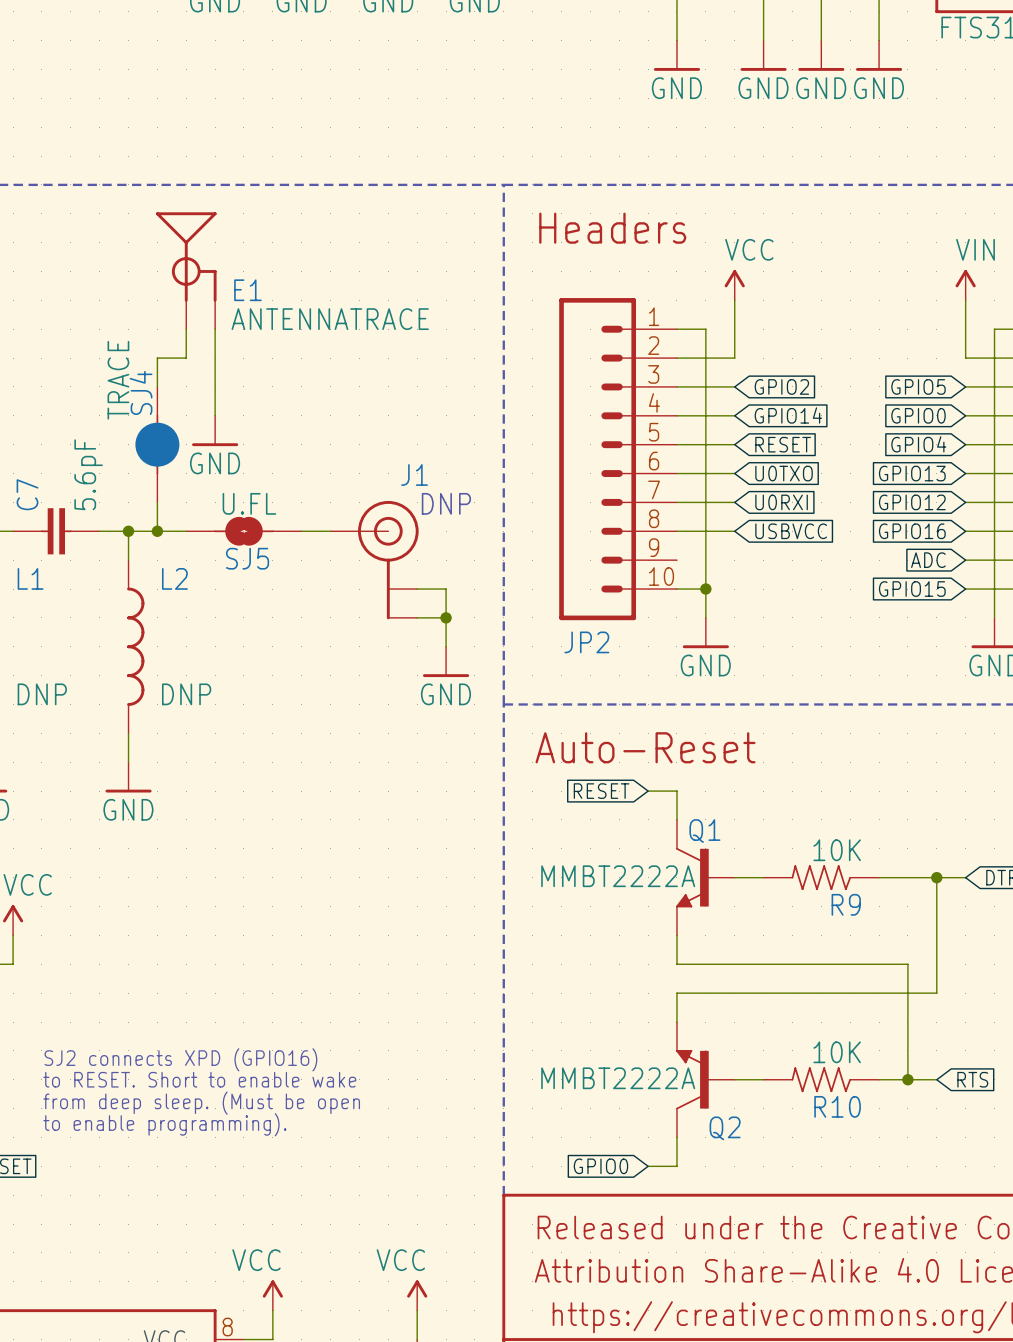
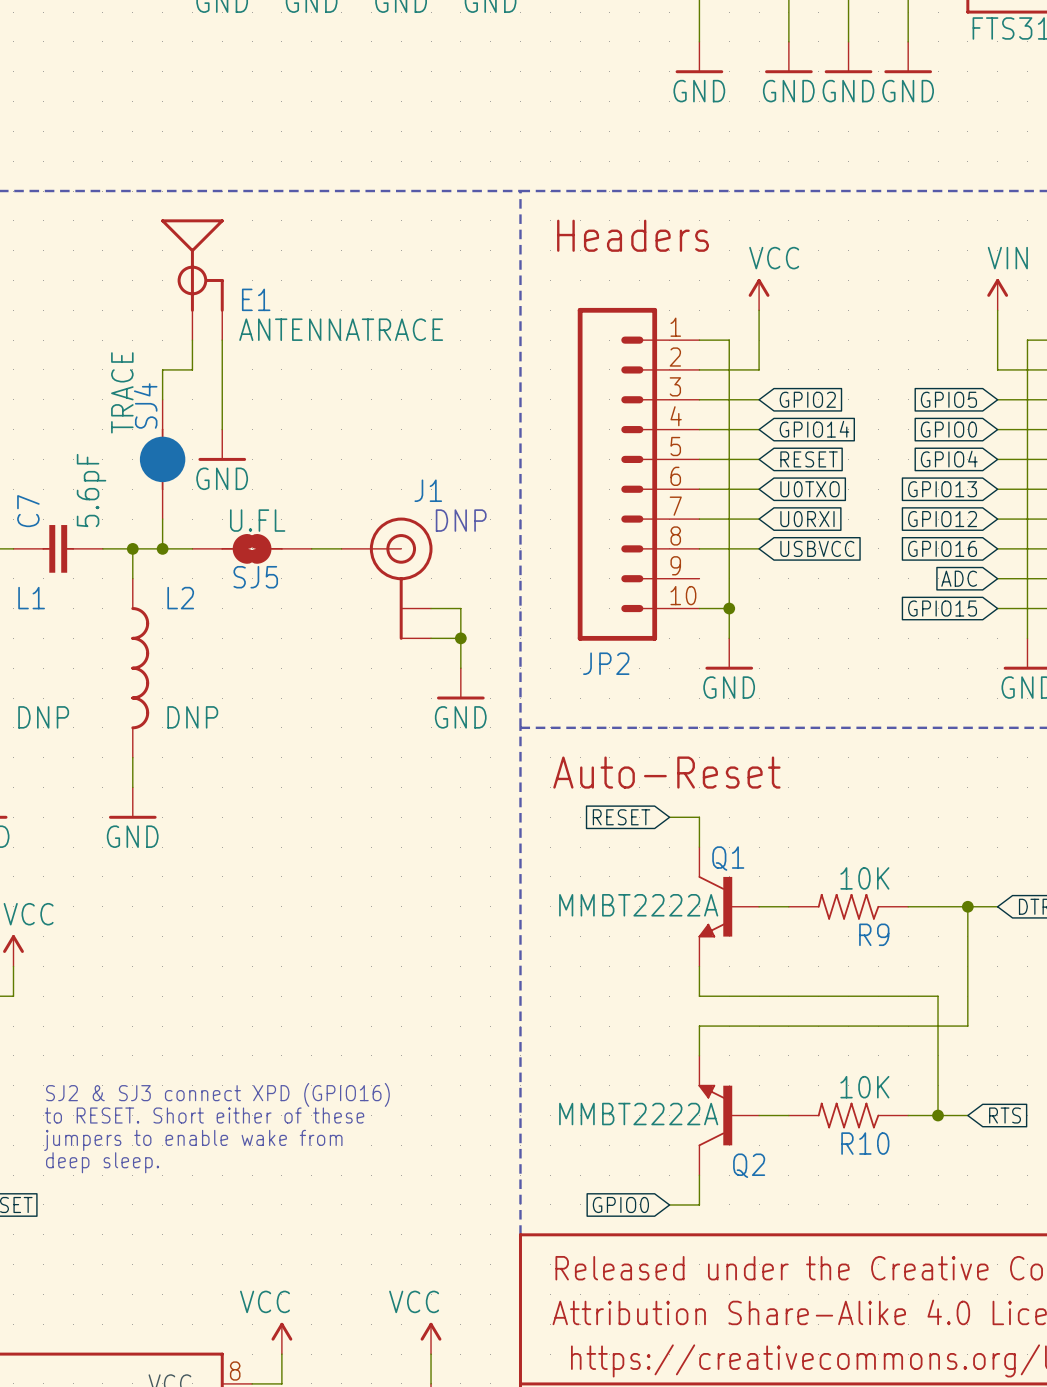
text: SJ2 connects XPD (GPIO16) (180, 1059) -> SJ2 & SJ3 connect XPD (GPIO16) (217, 1094)
text: to RESET. Short to enable wake (199, 1079) -> to RESET. Short either of these (204, 1115)
text: from deep sleep. (Must be open (201, 1103) -> jumpers to enable wake from (193, 1140)
text: to enable programming). (164, 1124) -> deep sleep. (102, 1162)

